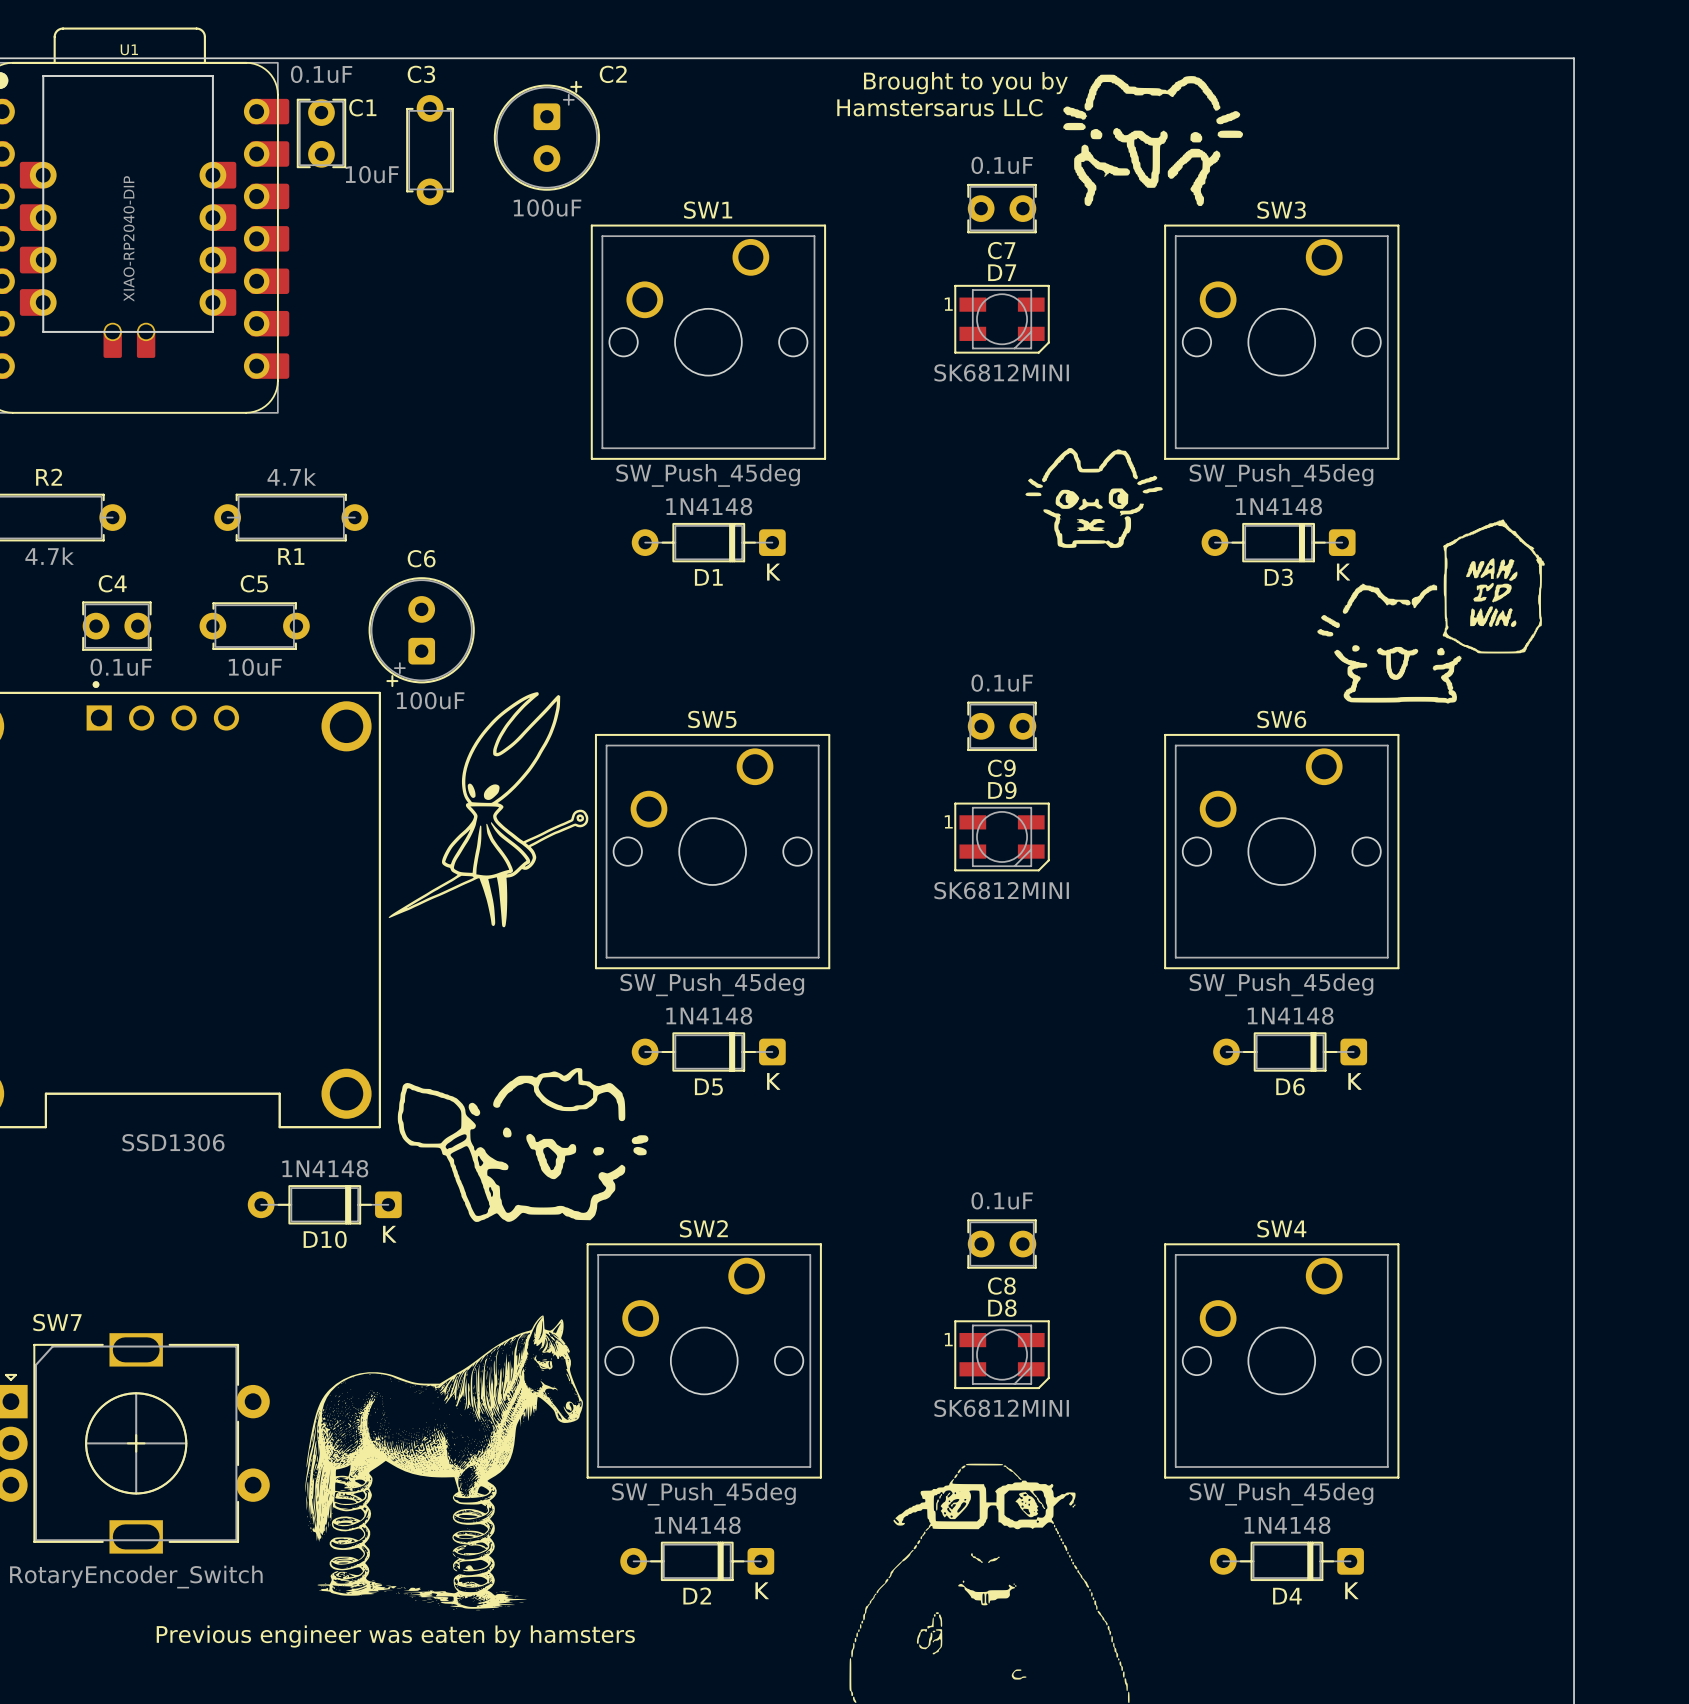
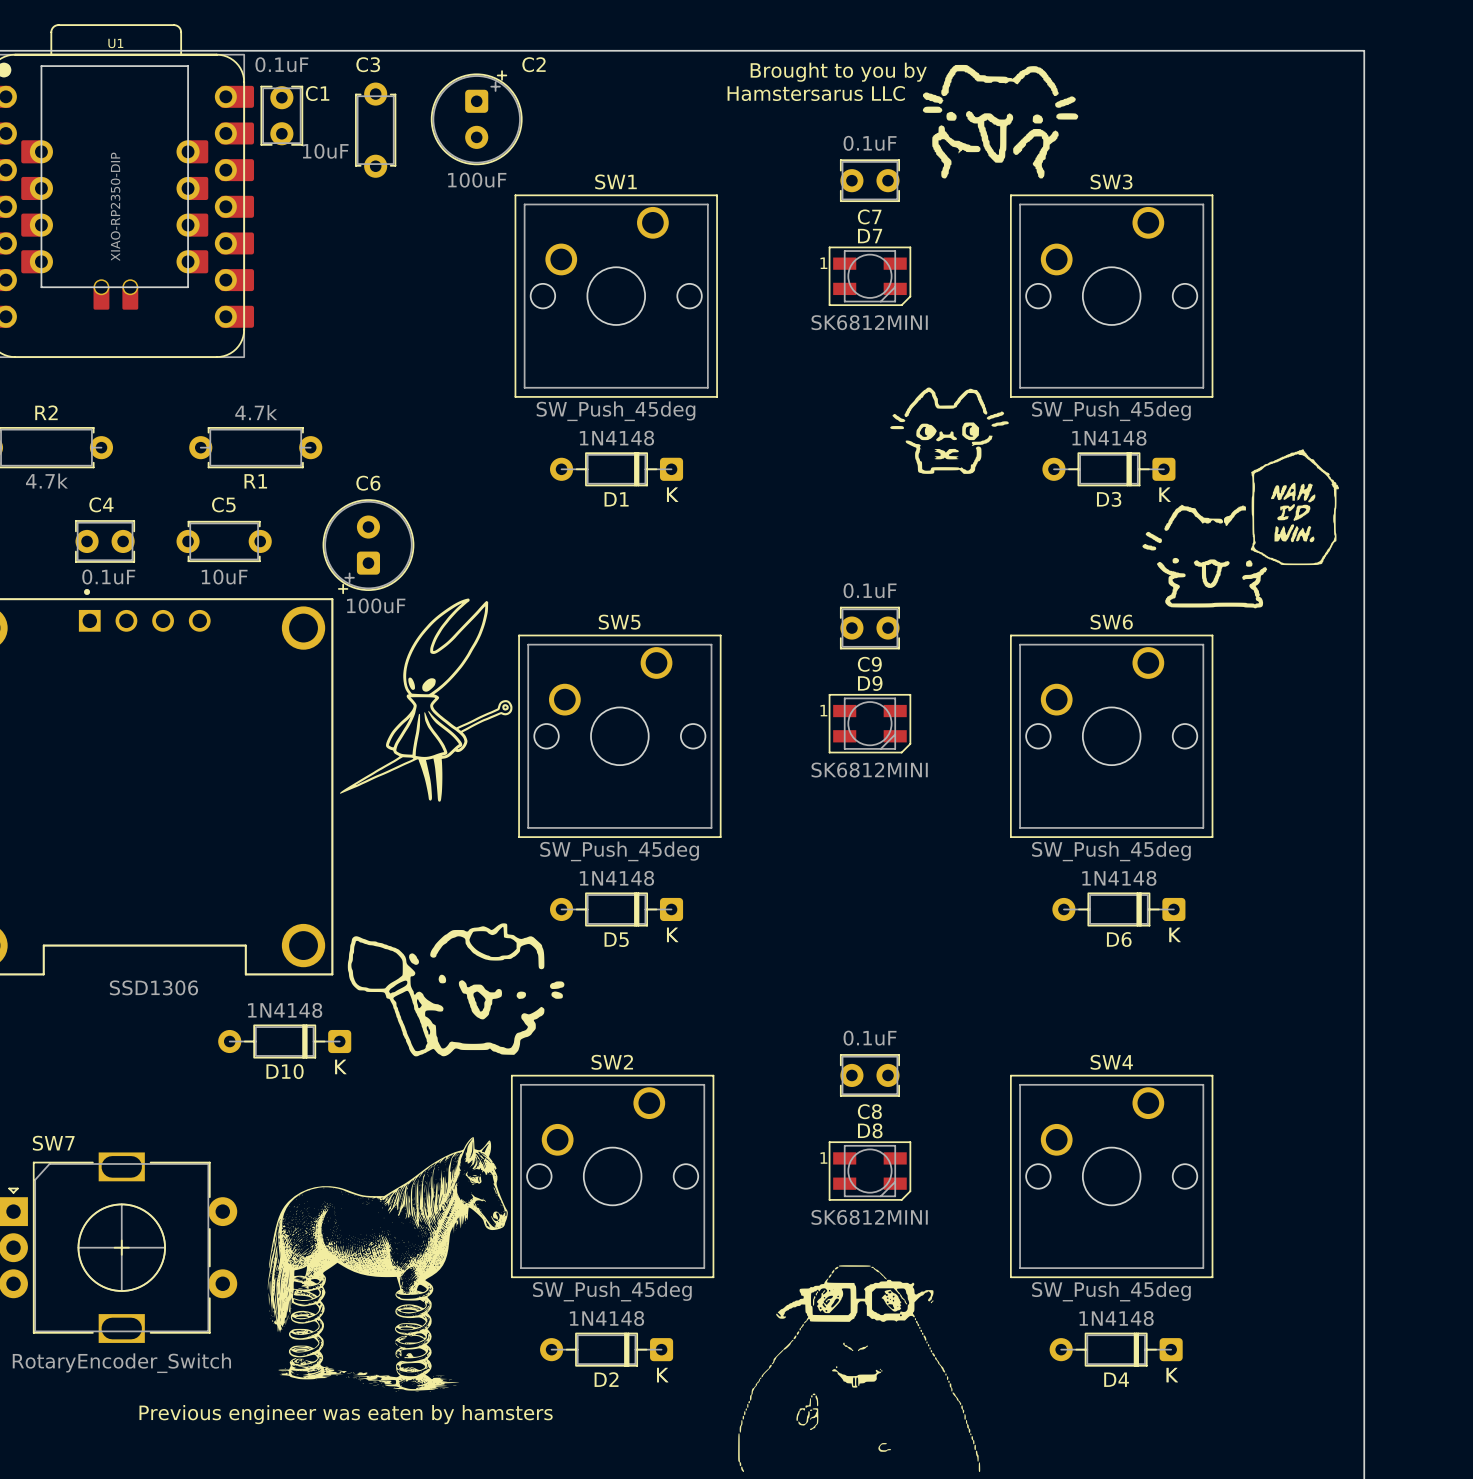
U1 value: XIAO-RP2040-DIP (129, 238) -> XIAO-RP2350-DIP (115, 206)

